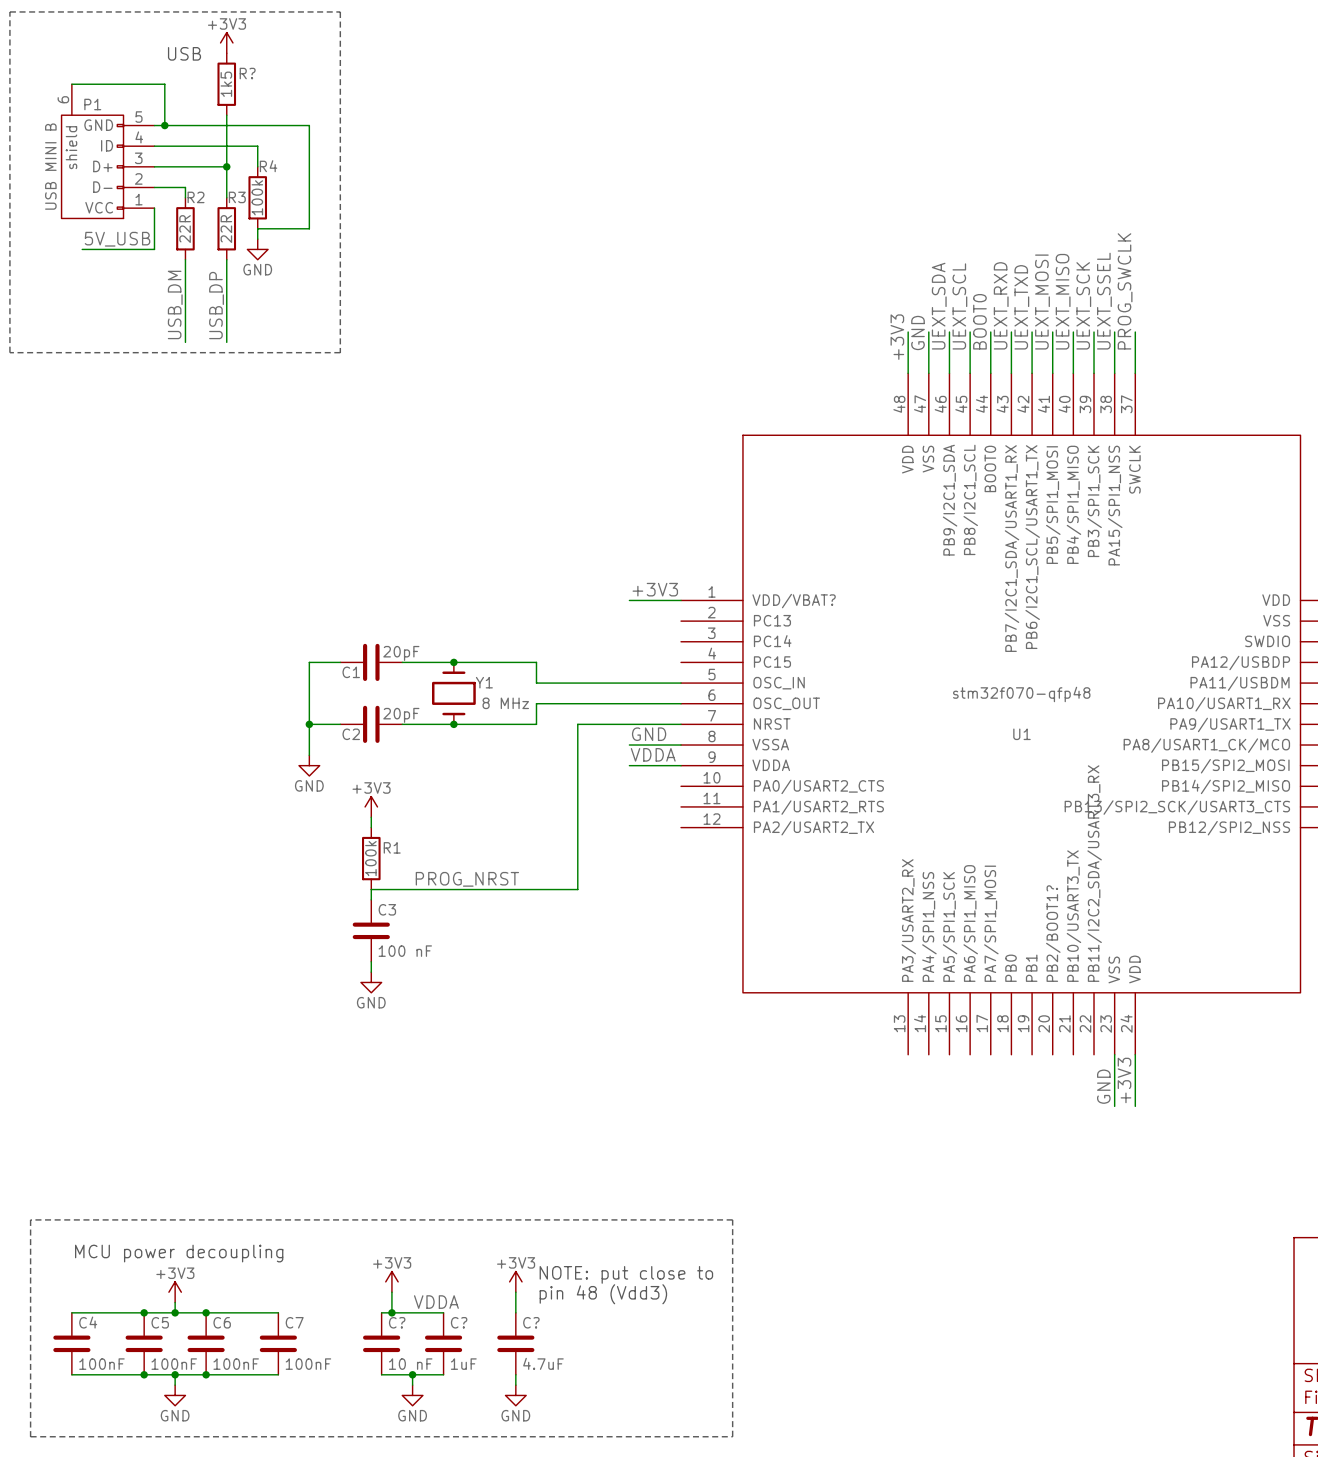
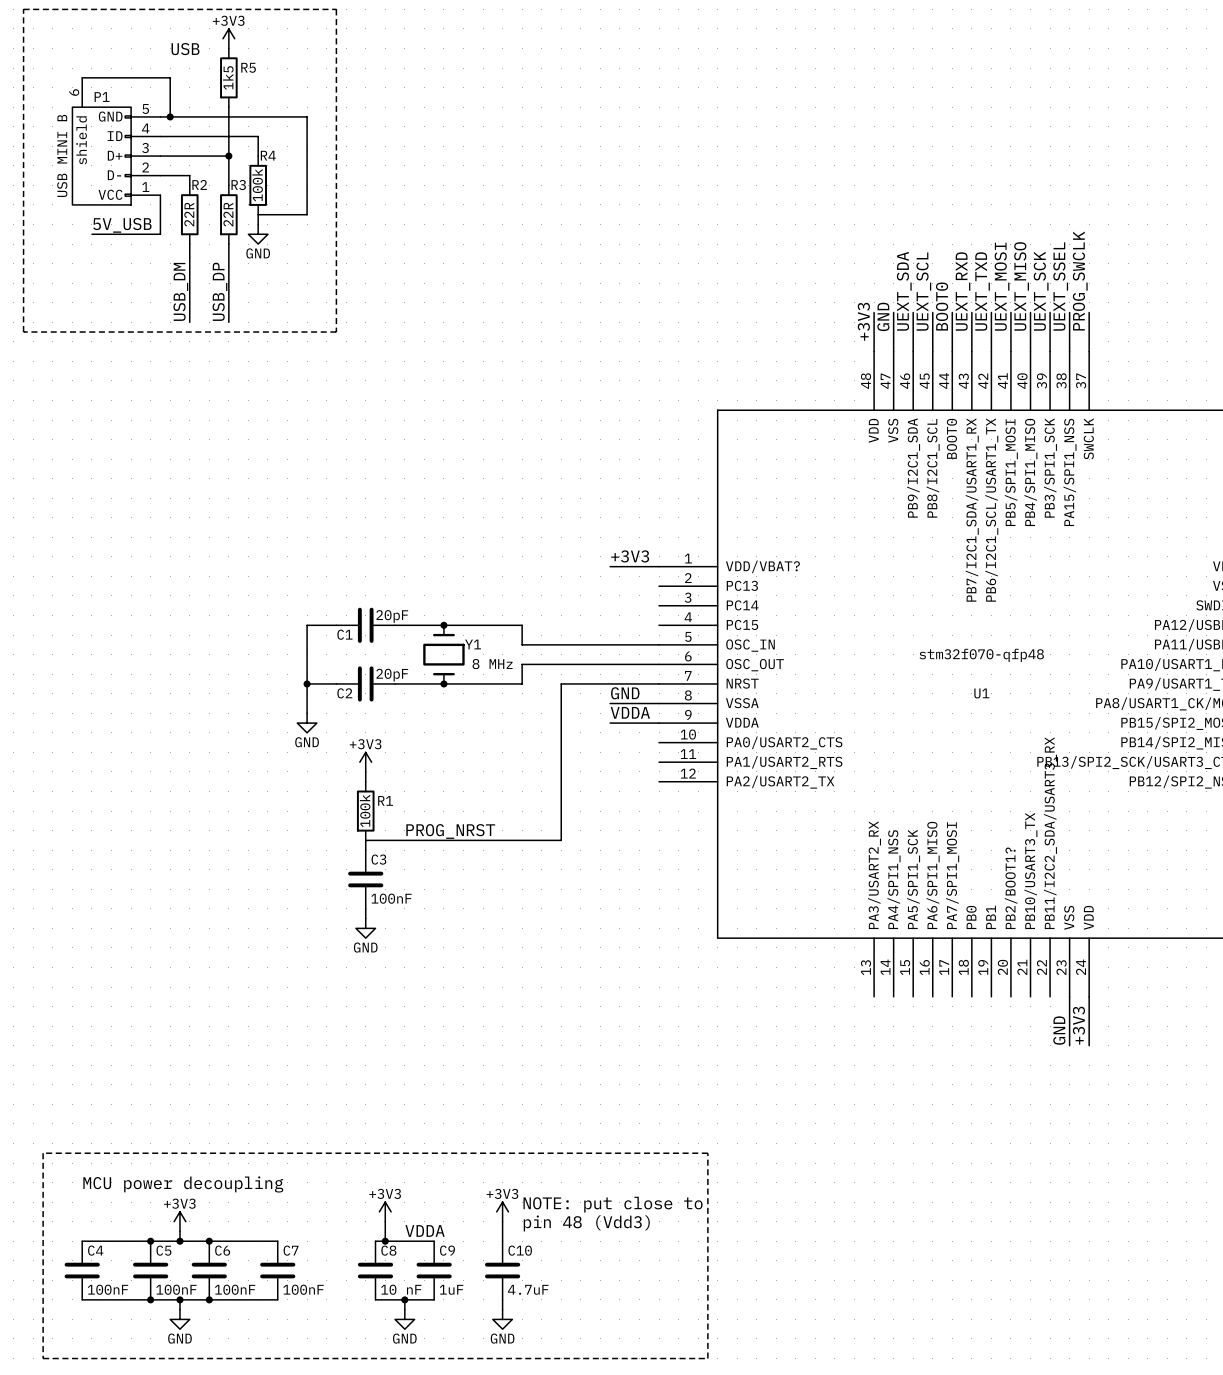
R? name: R? (247, 73) -> R5 (248, 67)
C3 value: 100 nF (405, 951) -> 100nF (391, 898)
C? name: C? (397, 1322) -> C8 (388, 1250)
C? name: C? (459, 1322) -> C9 (447, 1250)
C? name: C? (531, 1322) -> C10 (520, 1250)

